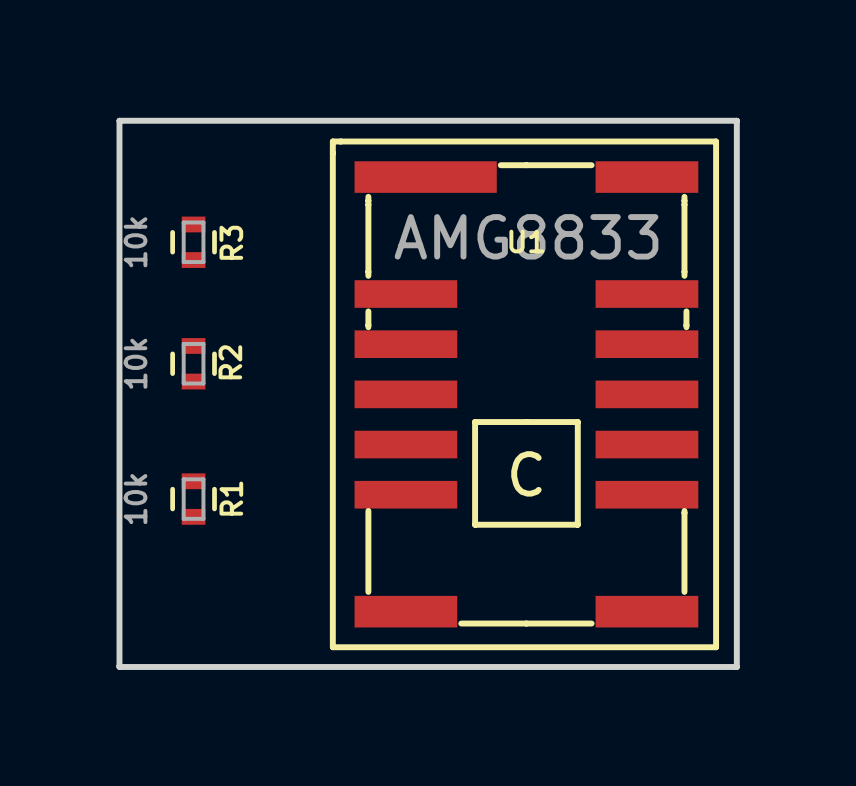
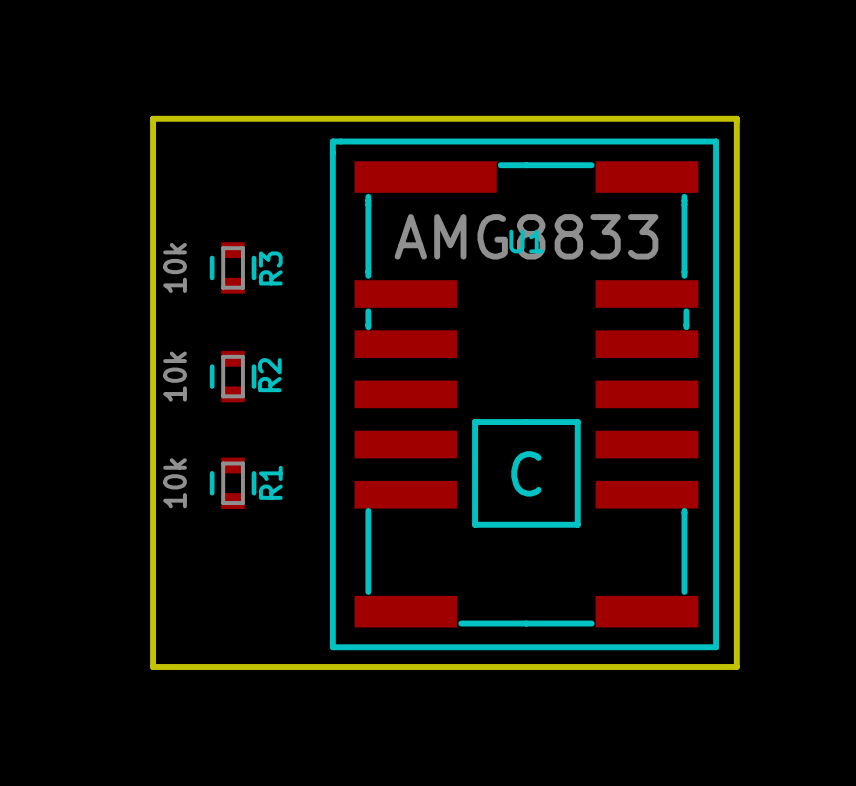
board edge: (736, 120) (119, 120) (119, 666) (153, 666) -> (736, 120) (736, 118) (153, 118) (153, 666)
R3 position: (193, 242) -> (233, 267)
R2 position: (193, 363) -> (233, 376)
R1 position: (193, 499) -> (233, 483)

